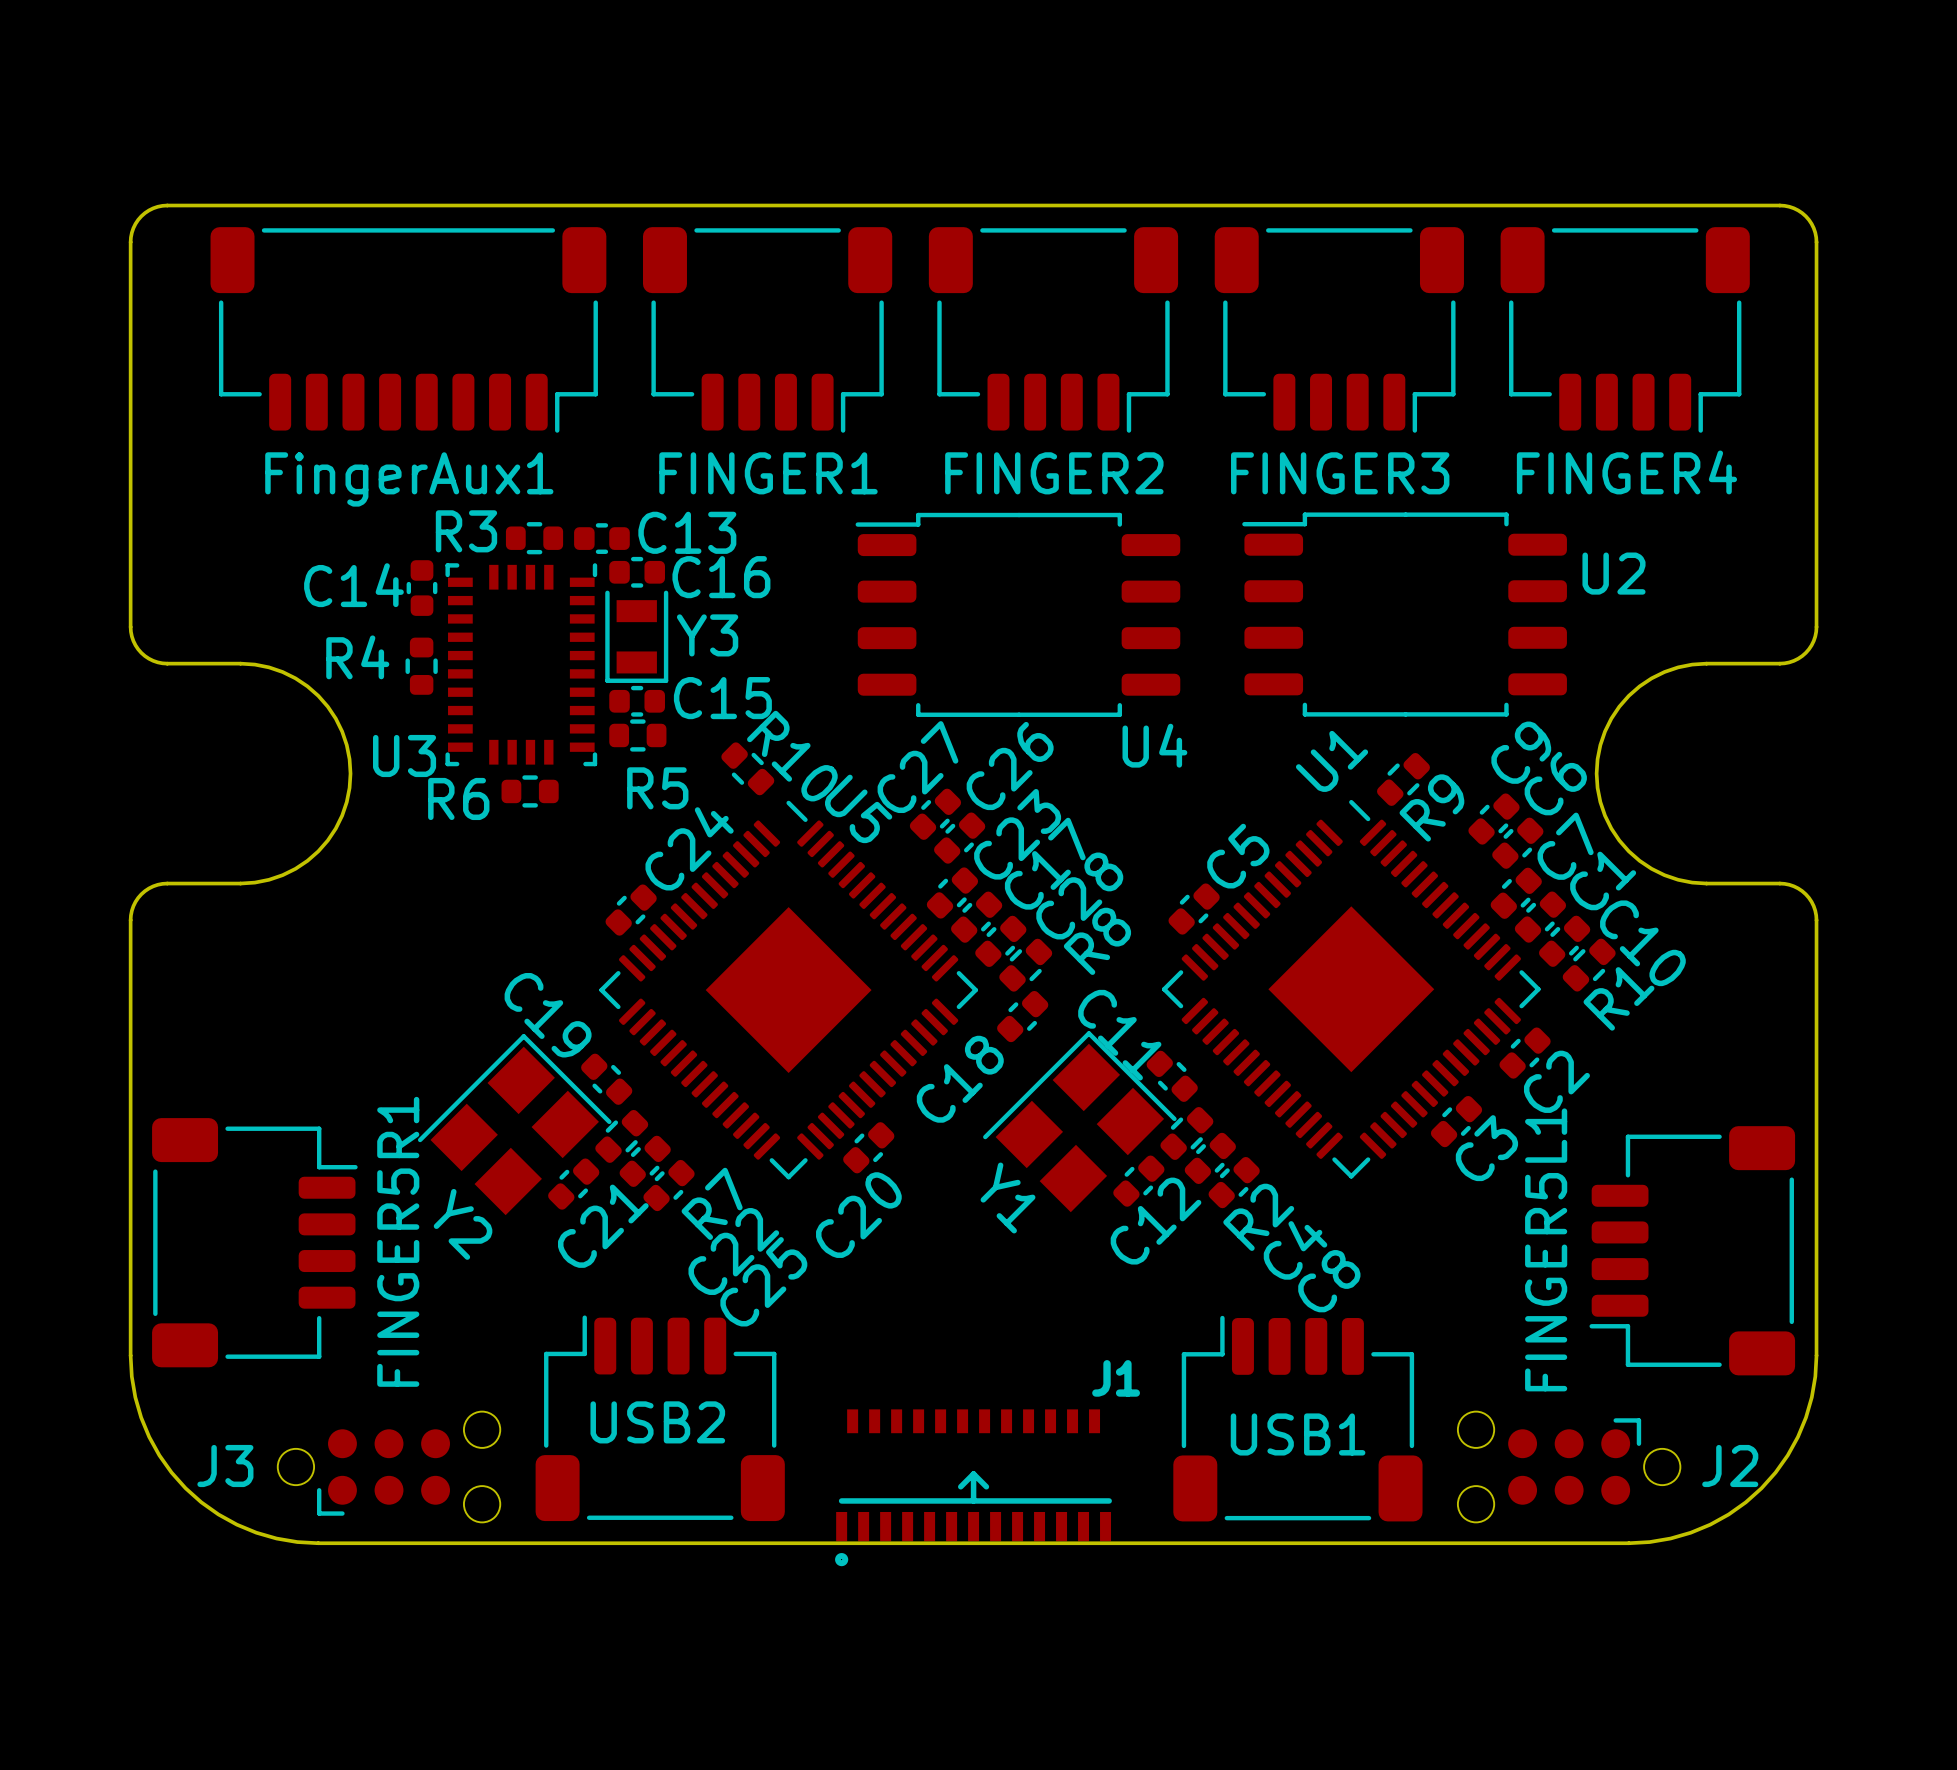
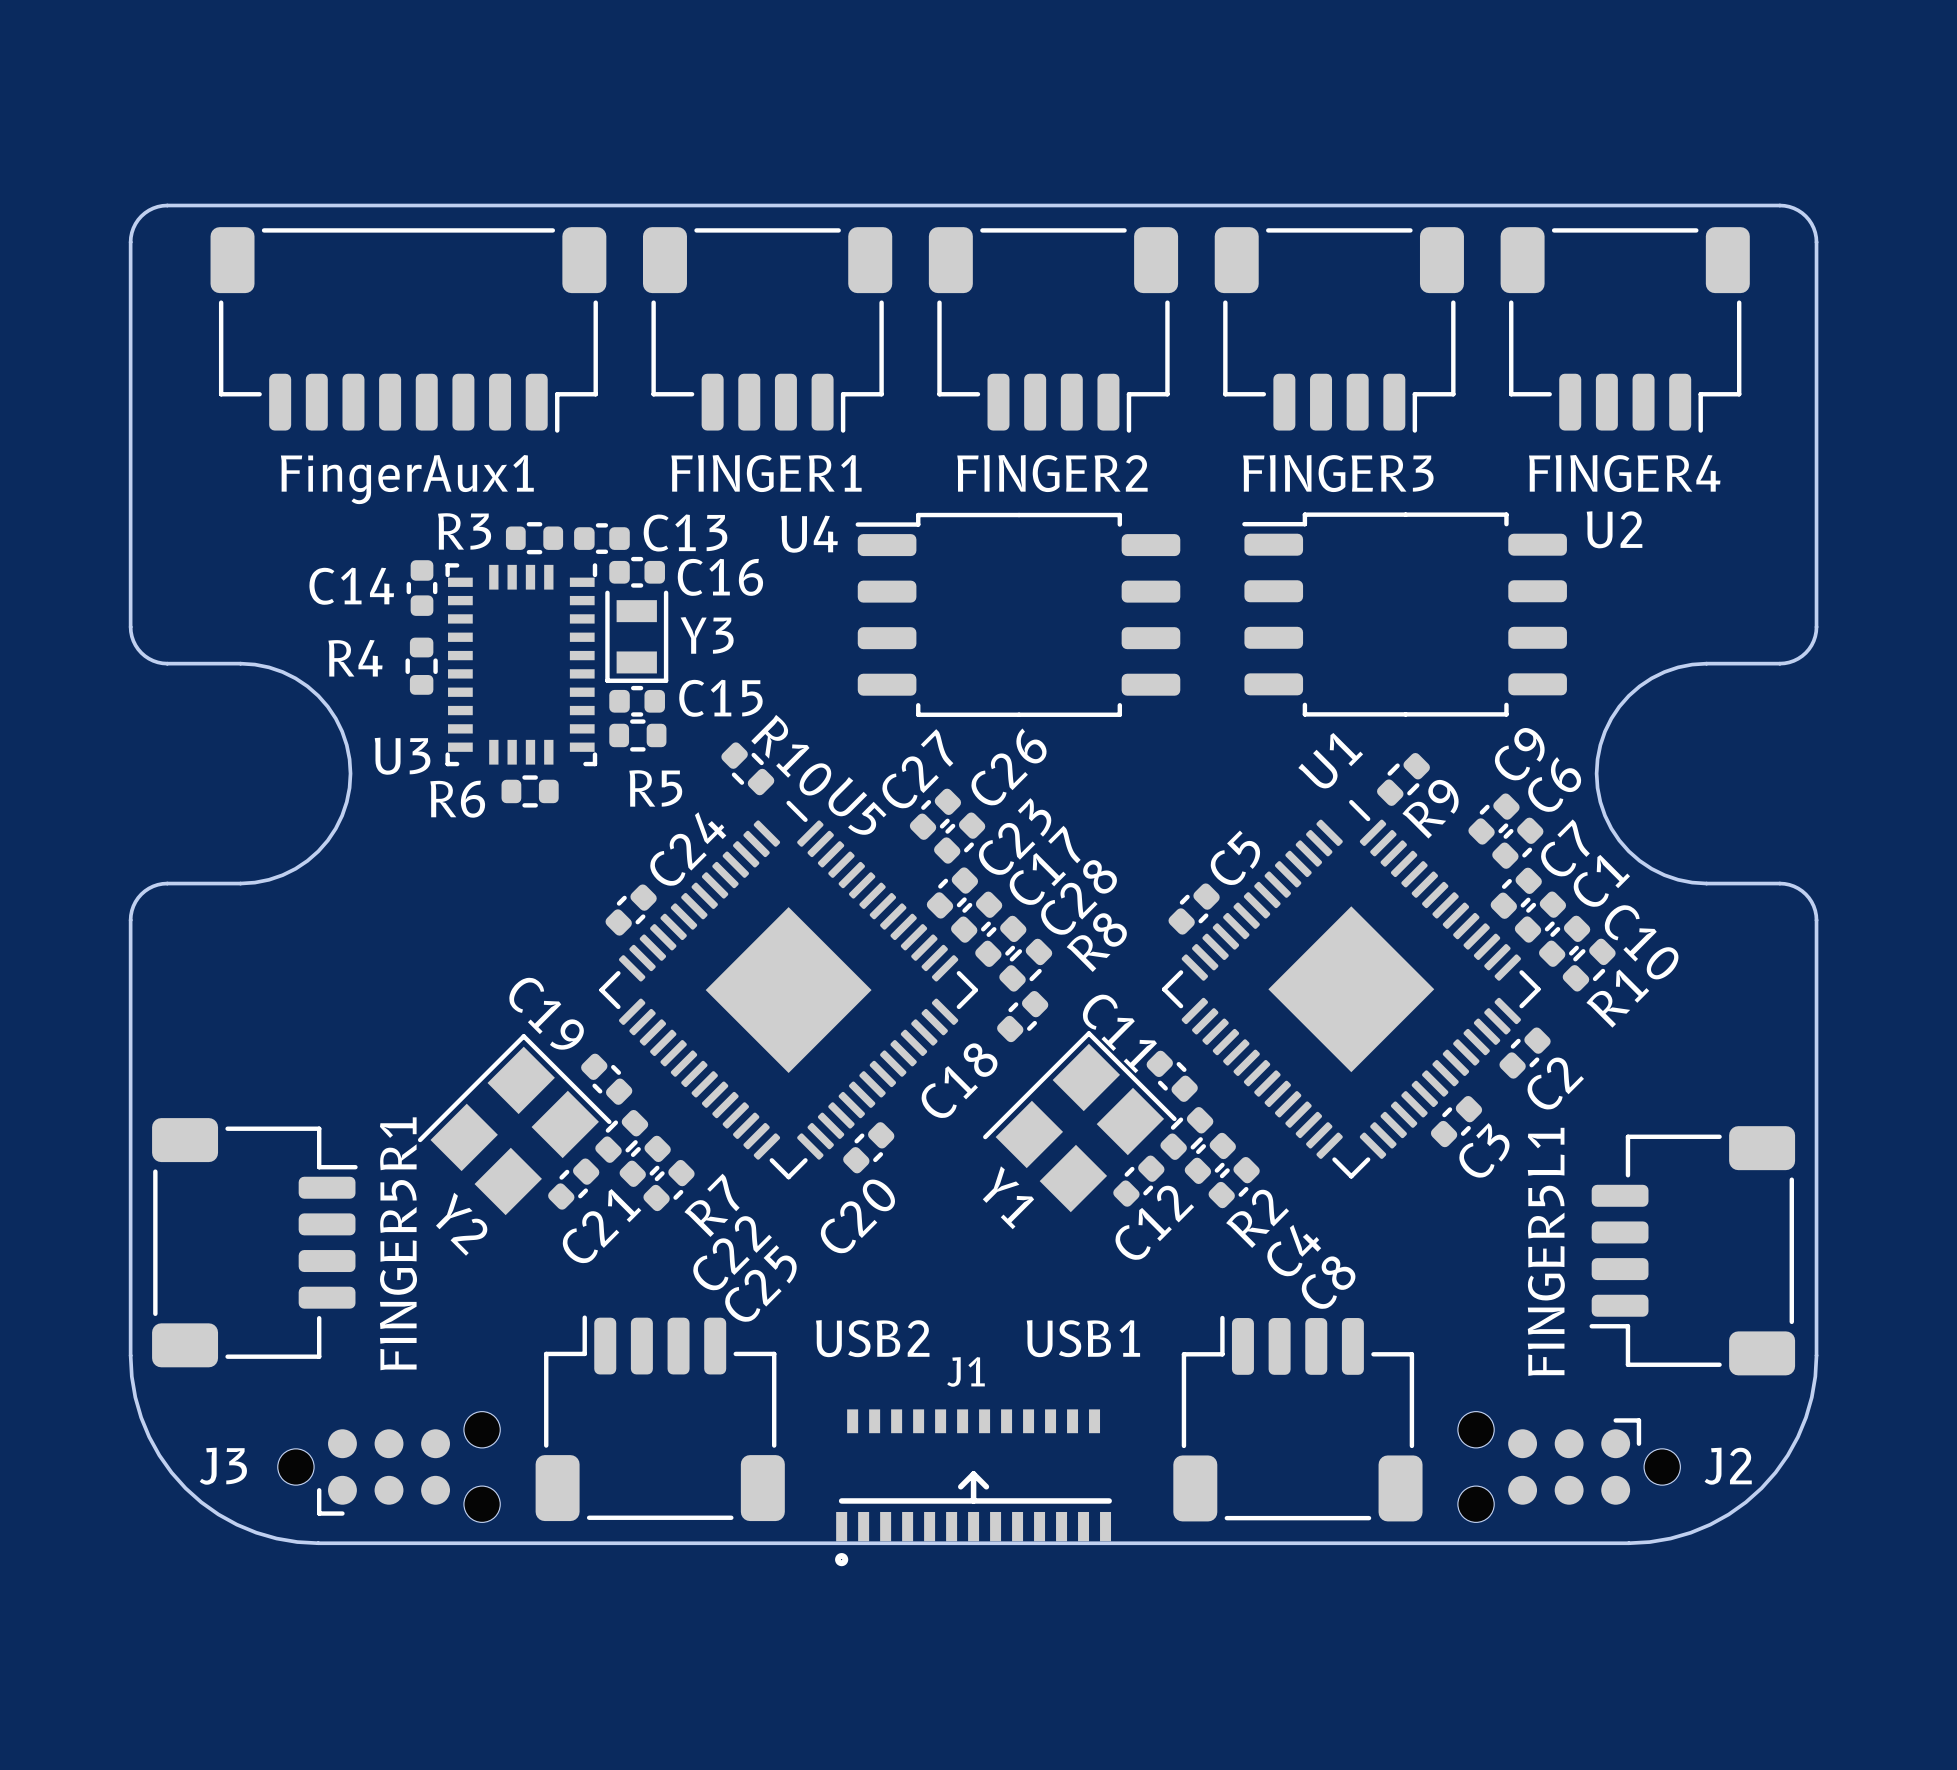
U2 name position: U2 (1613, 573) -> U2 (1614, 529)
U4 name position: U4 (1154, 745) -> U4 (809, 534)
J1 name position: J1 (1116, 1378) -> J1 (965, 1371)
USB2 name position: USB2 (657, 1422) -> USB2 (872, 1338)
USB1 name position: USB1 (1298, 1434) -> USB1 (1083, 1338)

